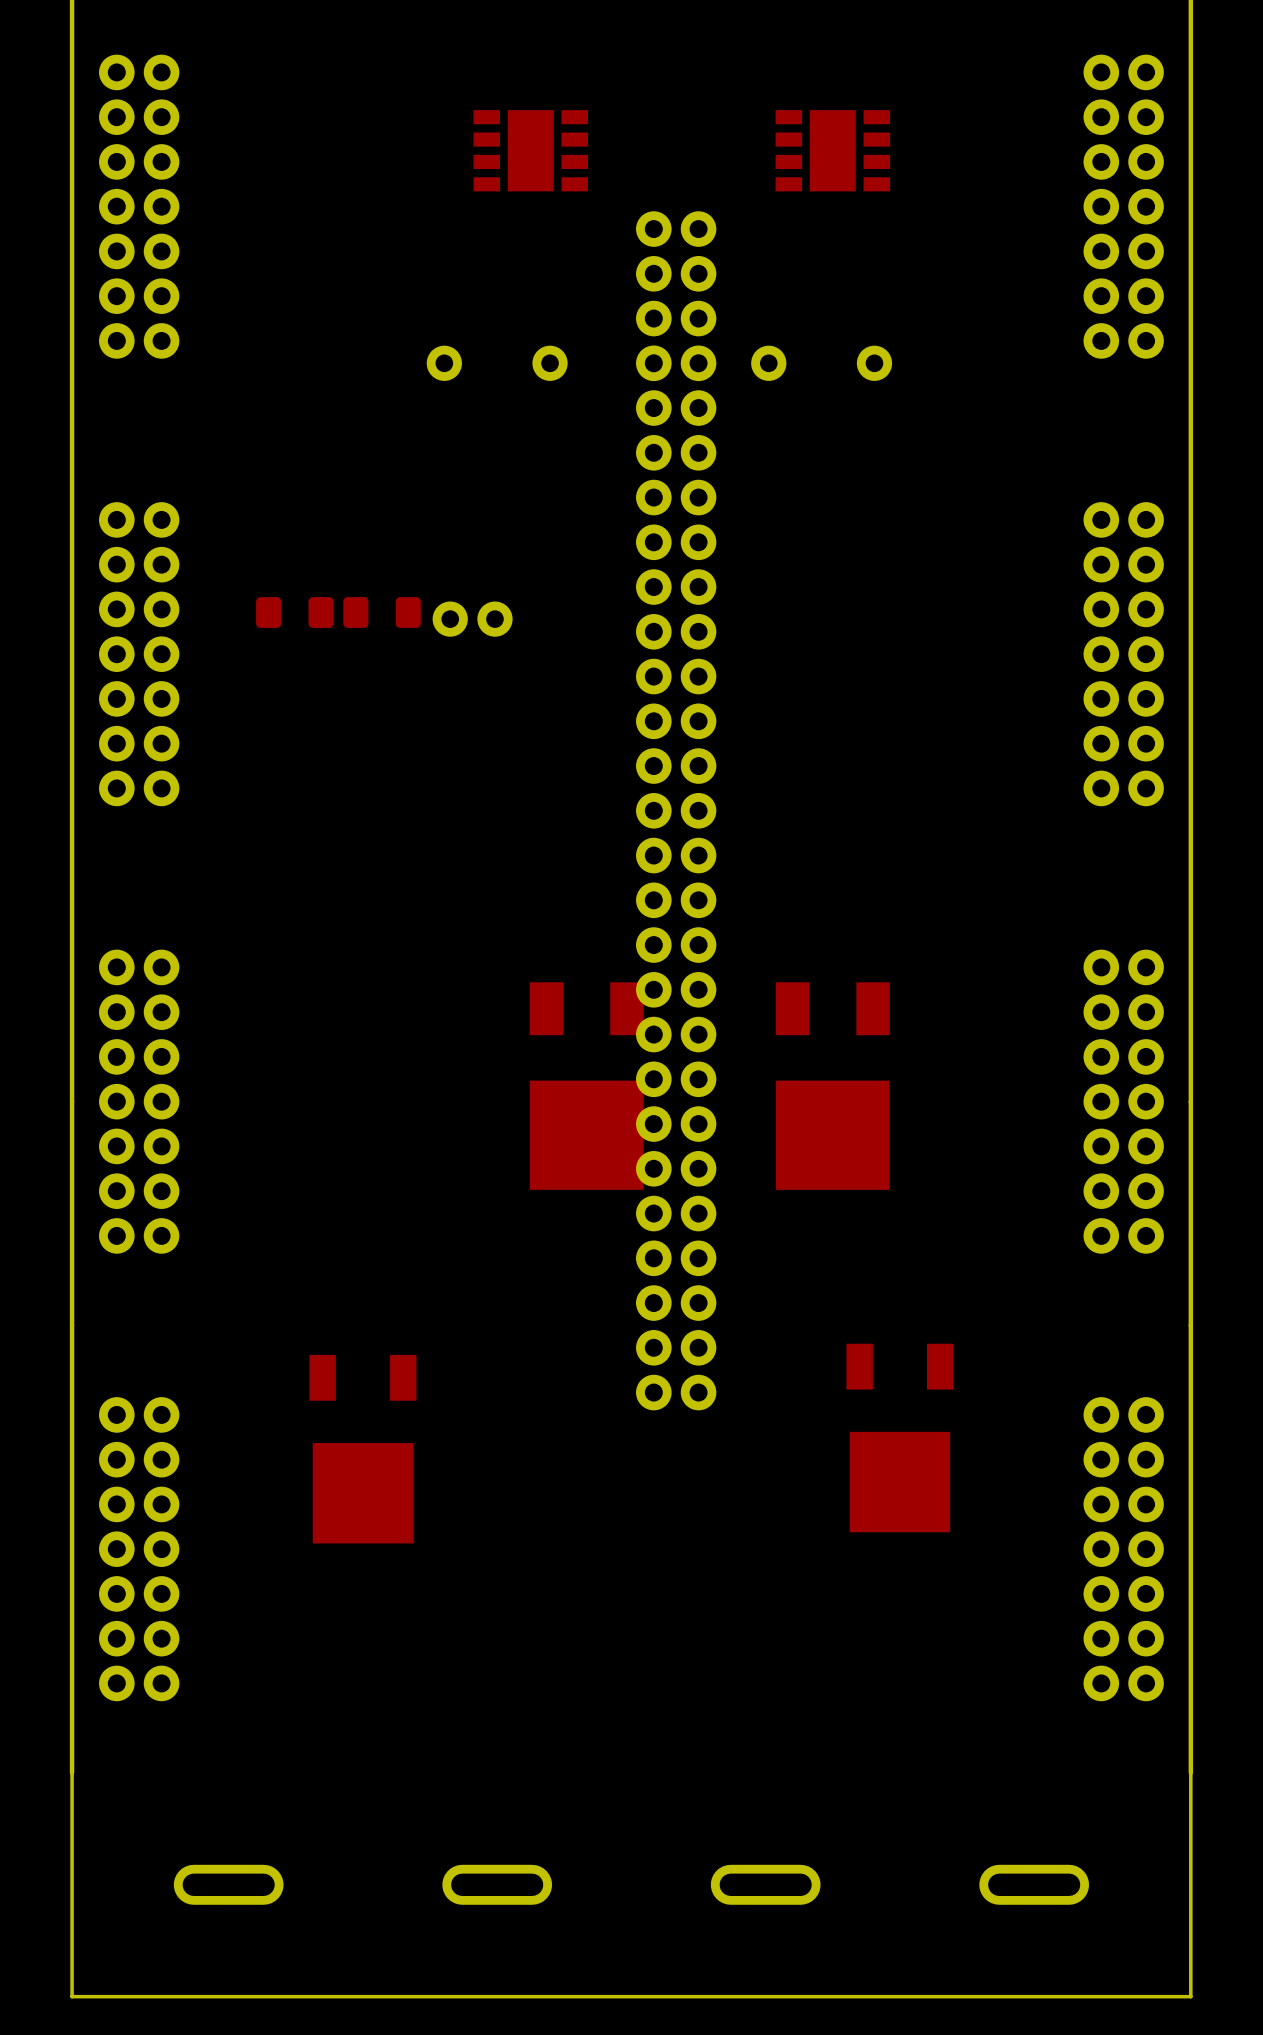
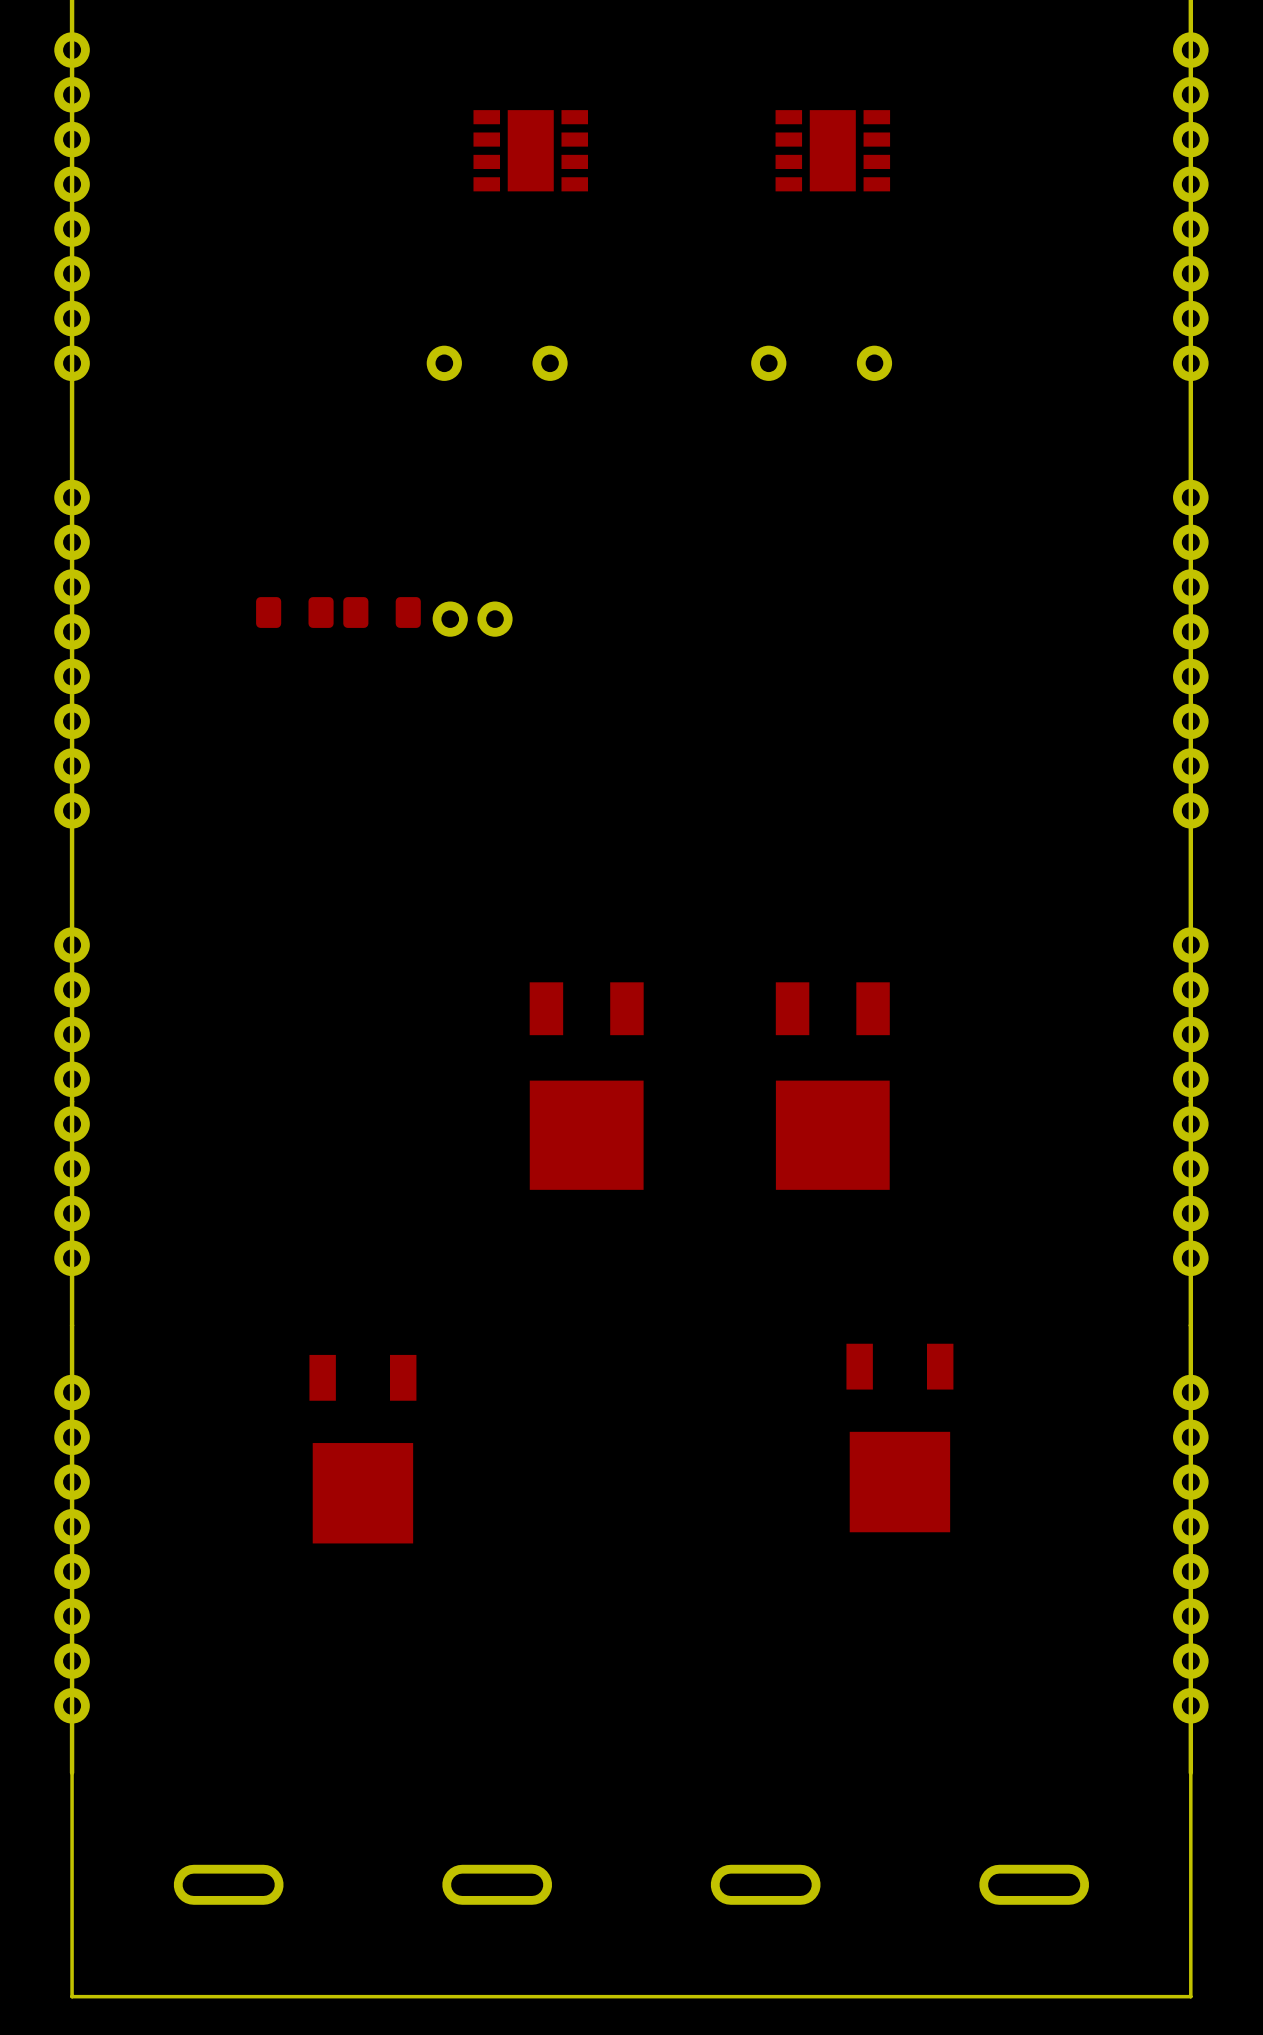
part: none -> (72, 206)
part: (139, 206) -> none
part: (1123, 206) -> none
part: none -> (1190, 206)
part: none -> (72, 654)
part: (139, 654) -> none
part: (1123, 654) -> none
part: none -> (1190, 654)
part: (676, 810) -> none
part: none -> (72, 1101)
part: (139, 1101) -> none
part: (1123, 1101) -> none
part: none -> (1190, 1101)
part: none -> (72, 1549)
part: (139, 1549) -> none
part: (1123, 1549) -> none
part: none -> (1190, 1549)

